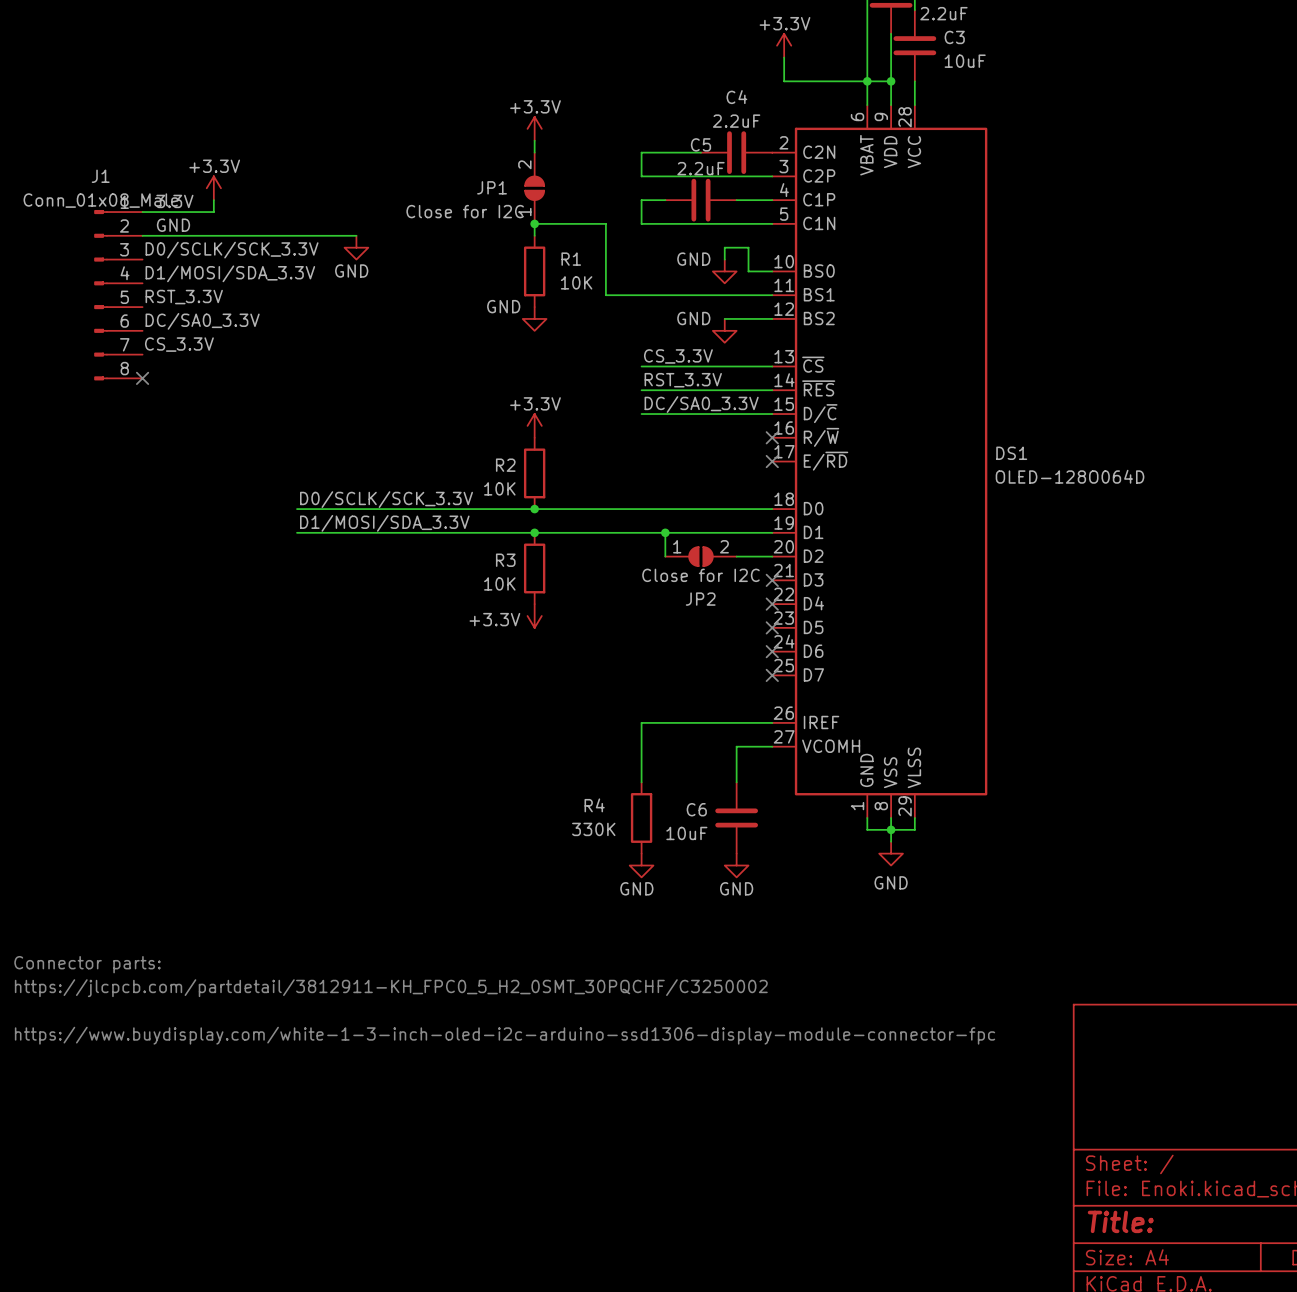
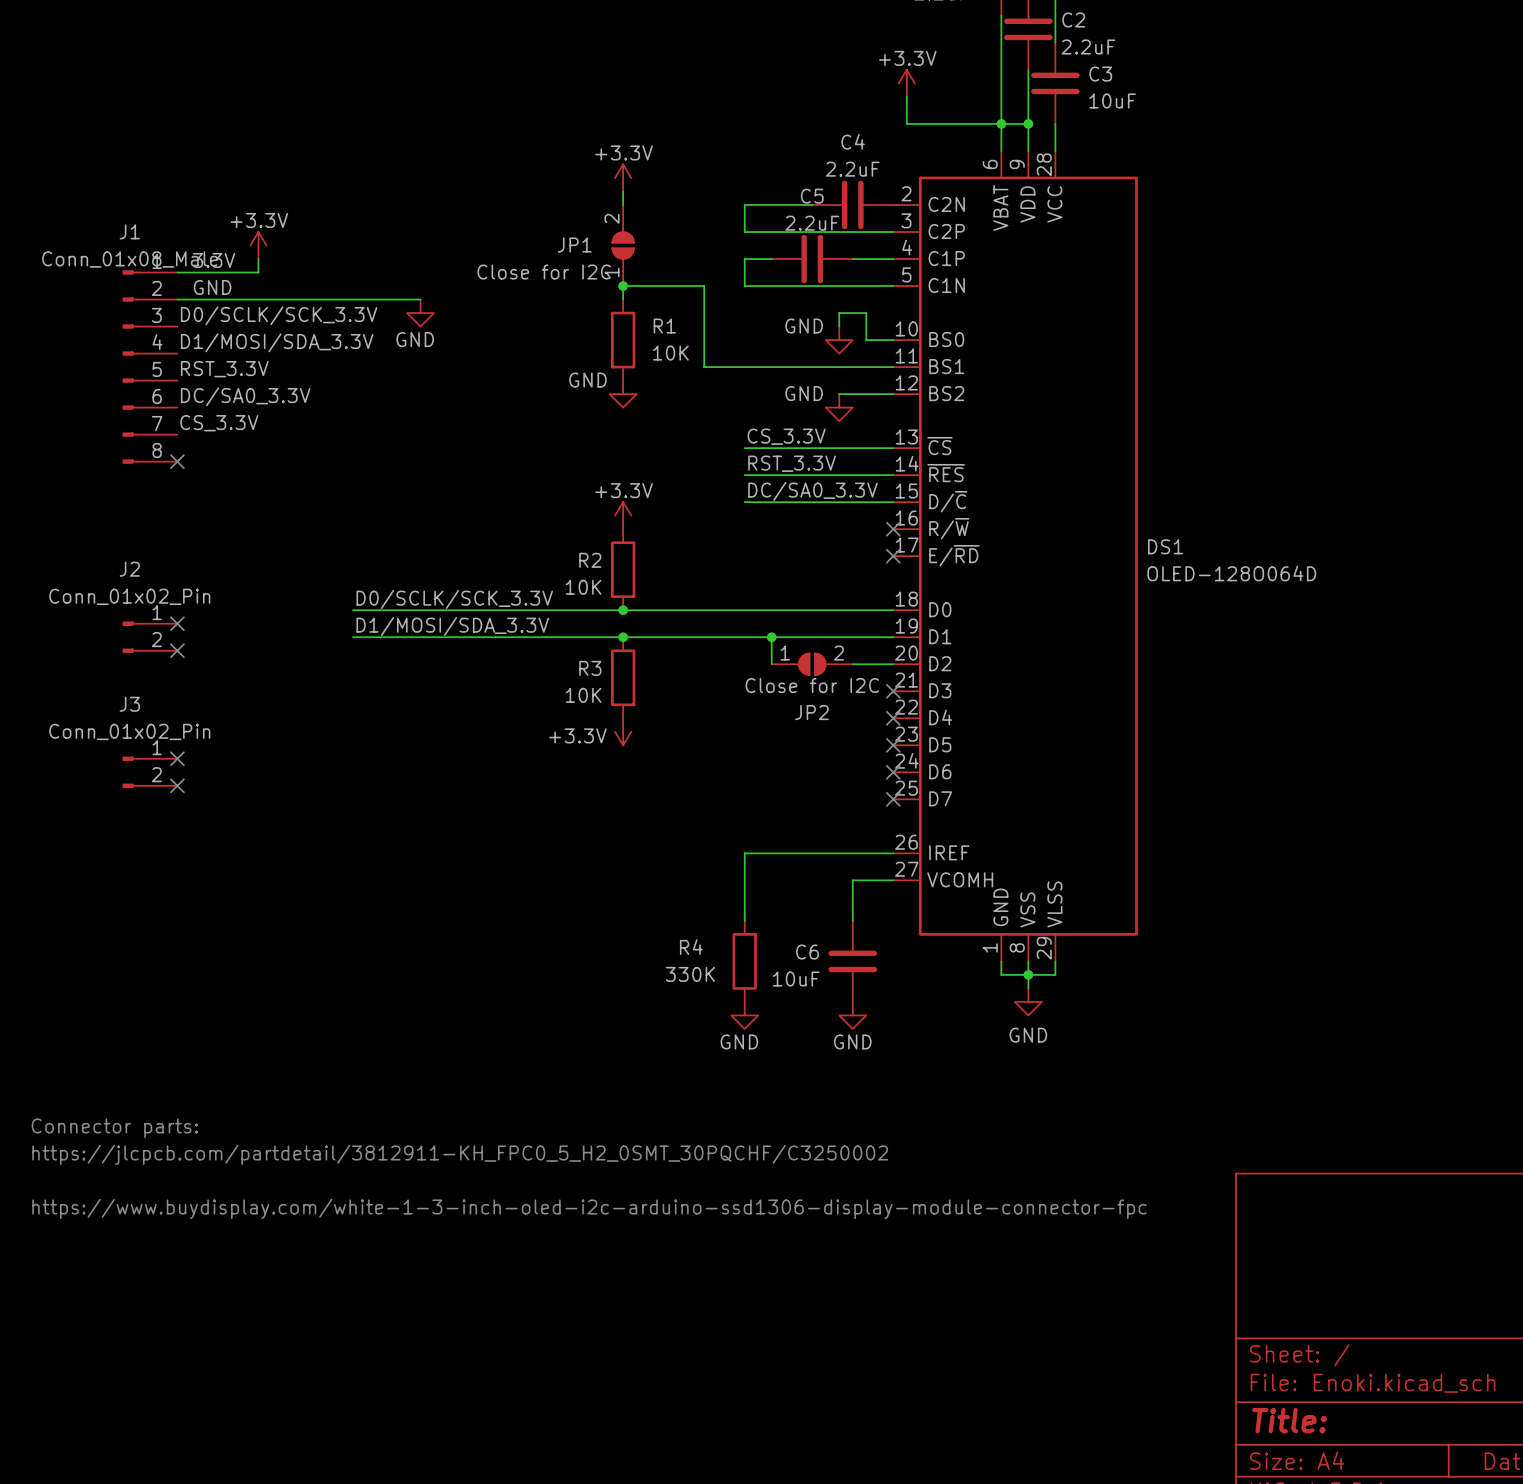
no-connect mark: none -> (177, 623)
J2: none -> Conn_01x02_Pin (149, 637)
no-connect mark: none -> (177, 650)
no-connect mark: none -> (177, 758)
J3: none -> Conn_01x02_Pin (149, 772)
no-connect mark: none -> (177, 785)

